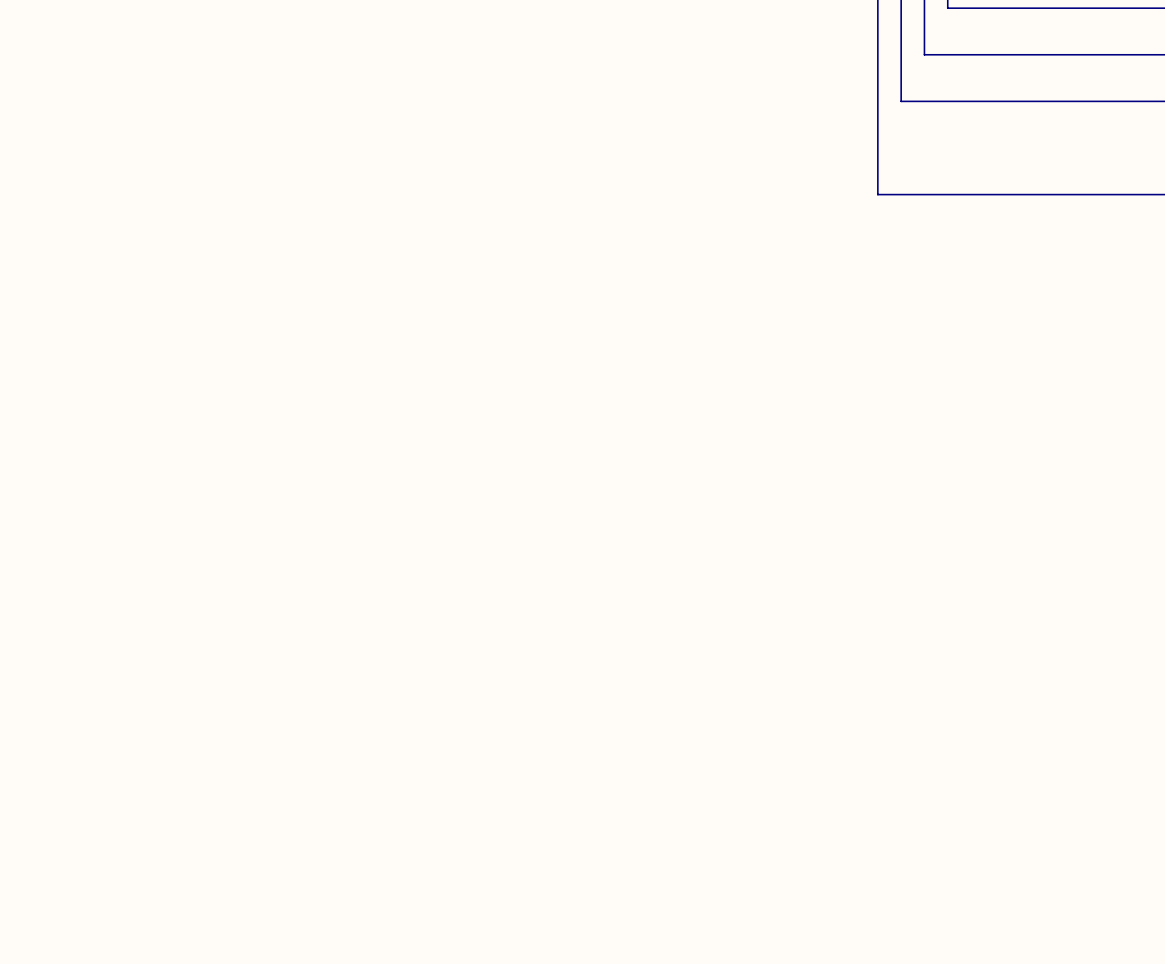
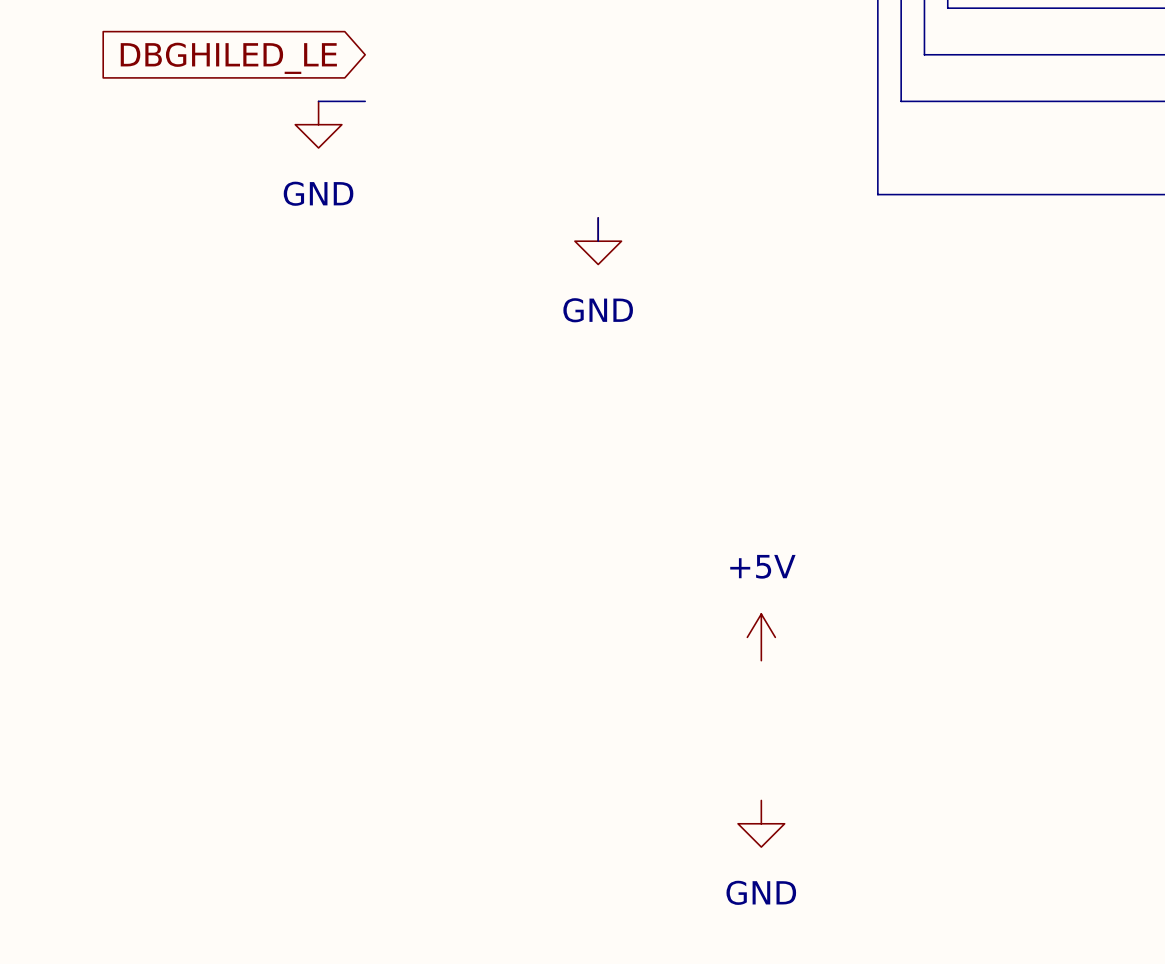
global label: none -> DBGHILED_LE (228, 58)
wire: none -> (318, 101) (365, 101)
power symbol: none -> GND (318, 124)
wire: none -> (598, 217) (598, 241)
power symbol: none -> GND (598, 241)
power symbol: none -> +5V (761, 637)
power symbol: none -> GND (761, 823)

